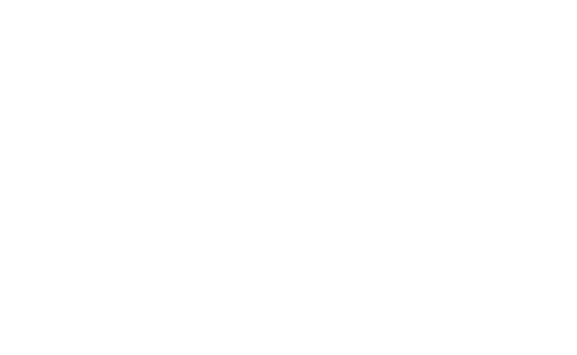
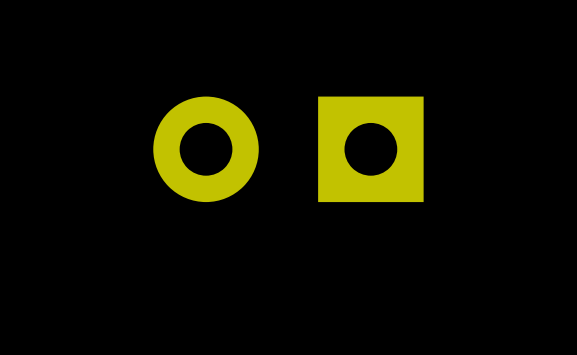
part: none -> (288, 149)

